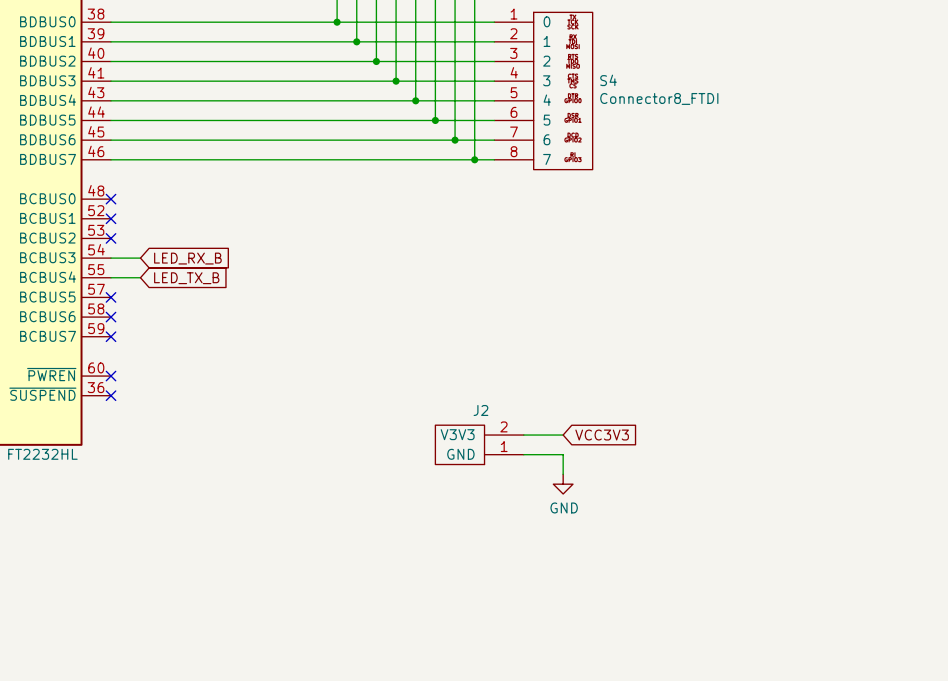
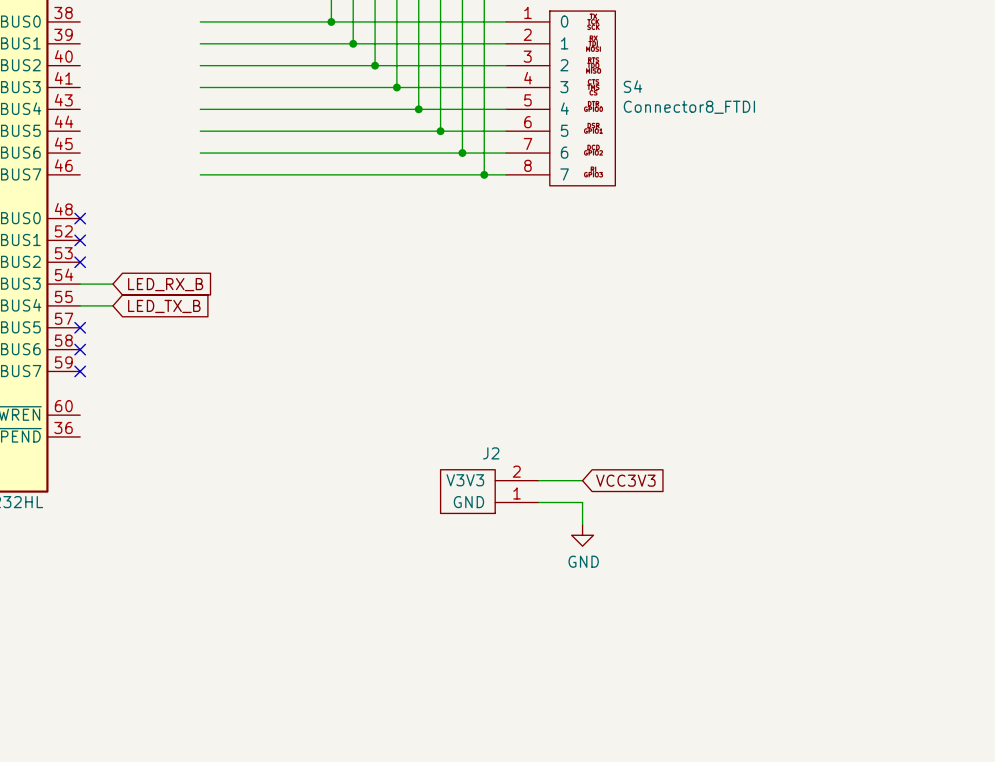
wire: (111, 22) (219, 22) -> none
wire: (111, 41) (219, 41) -> none
wire: (111, 61) (219, 61) -> none
wire: (111, 81) (219, 81) -> none
wire: (111, 100) (219, 100) -> none
wire: (111, 120) (219, 120) -> none
wire: (111, 140) (219, 140) -> none
wire: (111, 159) (219, 159) -> none
no-connect mark: (111, 376) -> none
no-connect mark: (111, 395) -> none

